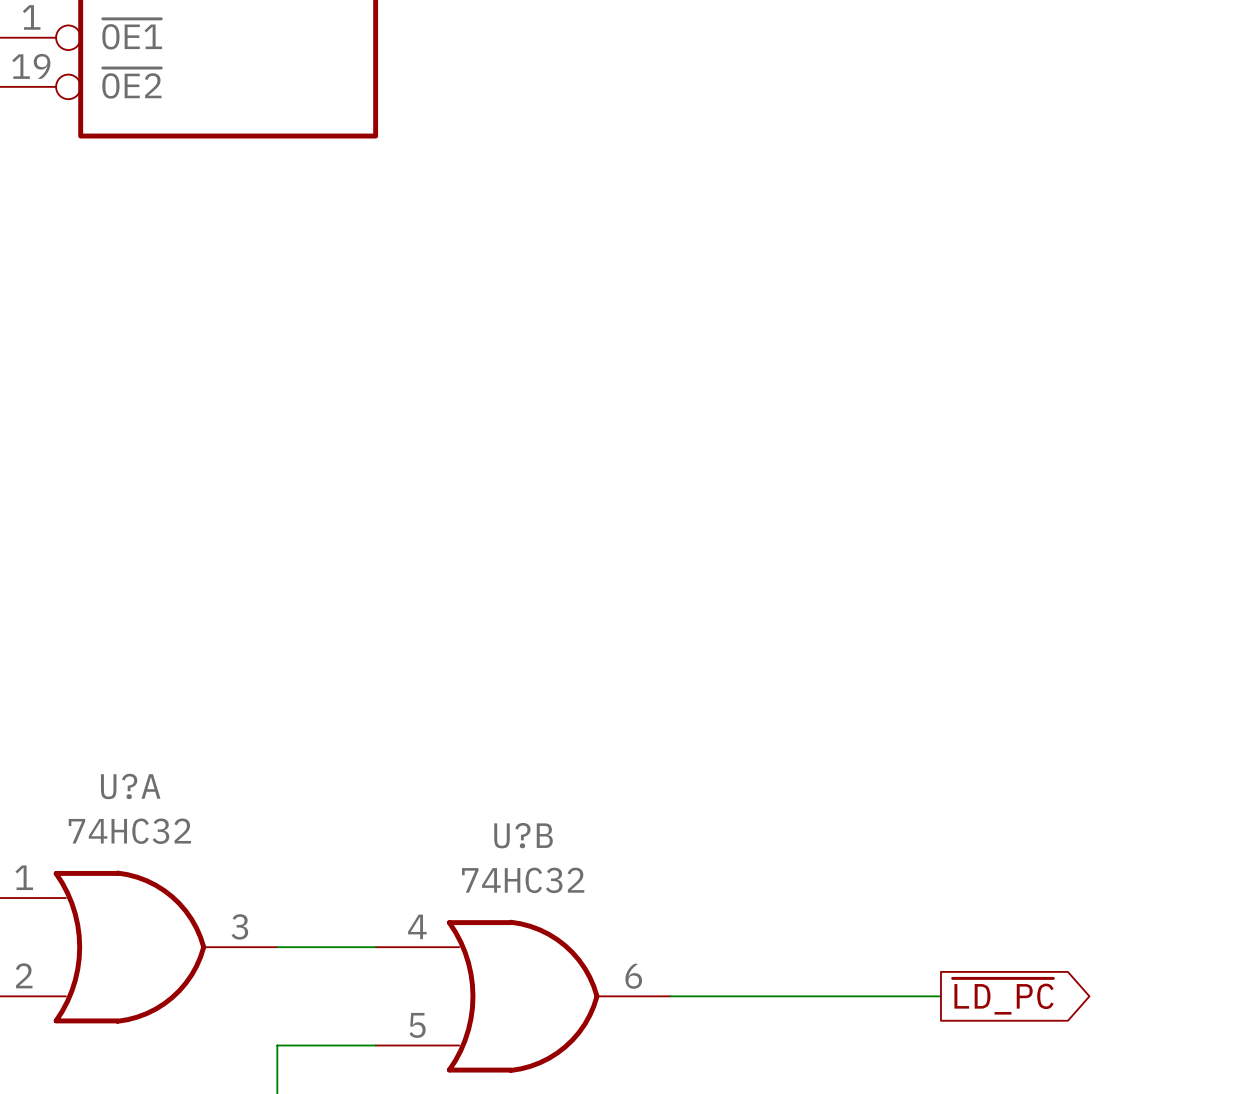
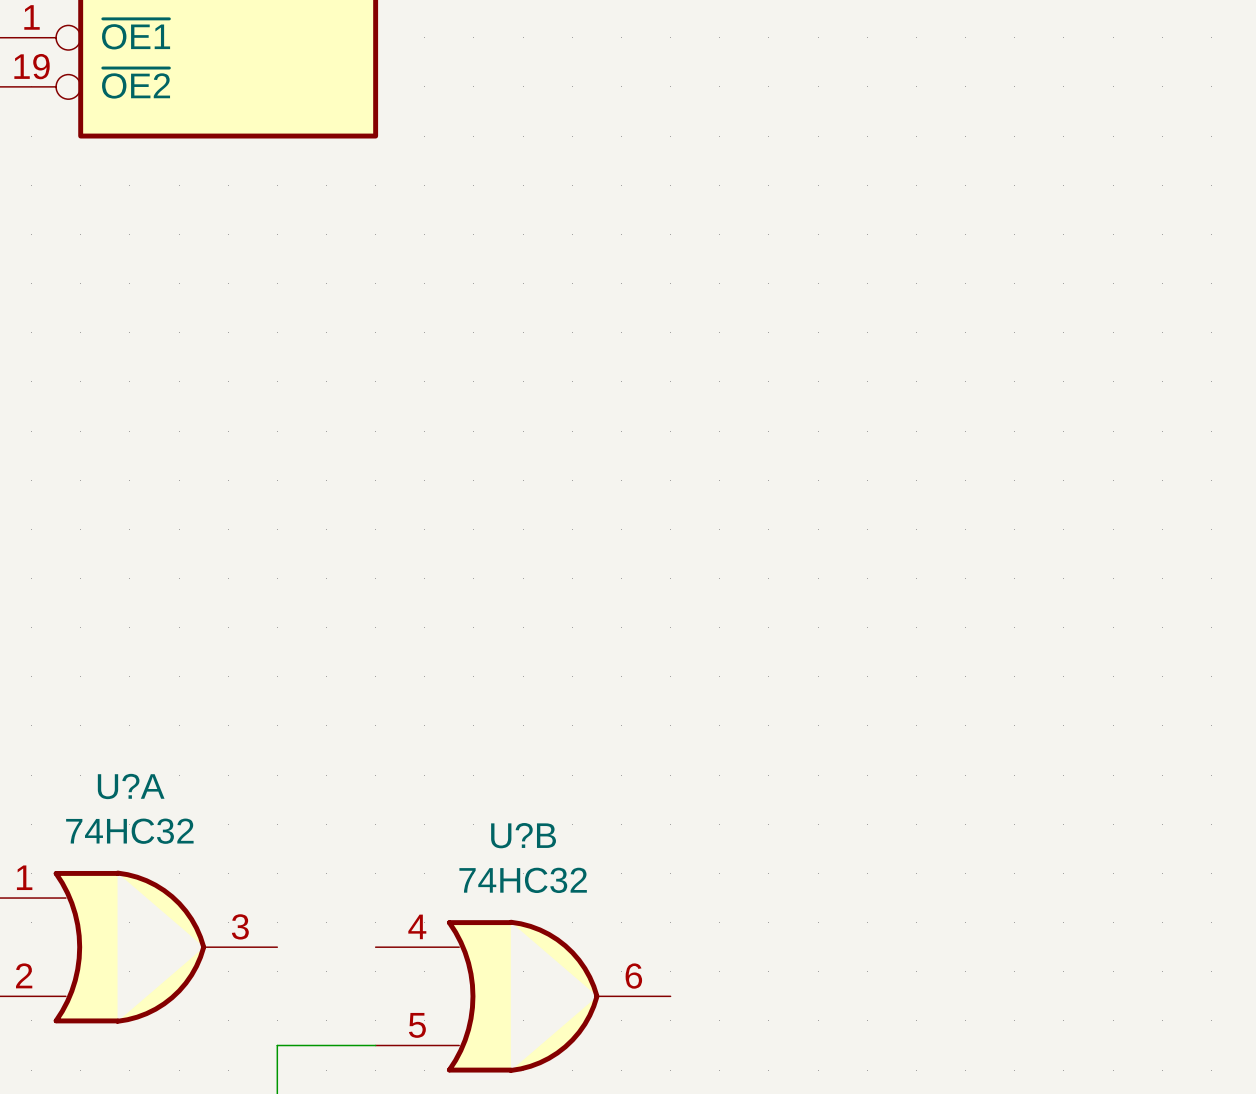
wire: (277, 947) (375, 947) -> none
wire: (670, 996) (940, 996) -> none
global label: ~{LD_PC} (1003, 996) -> none

